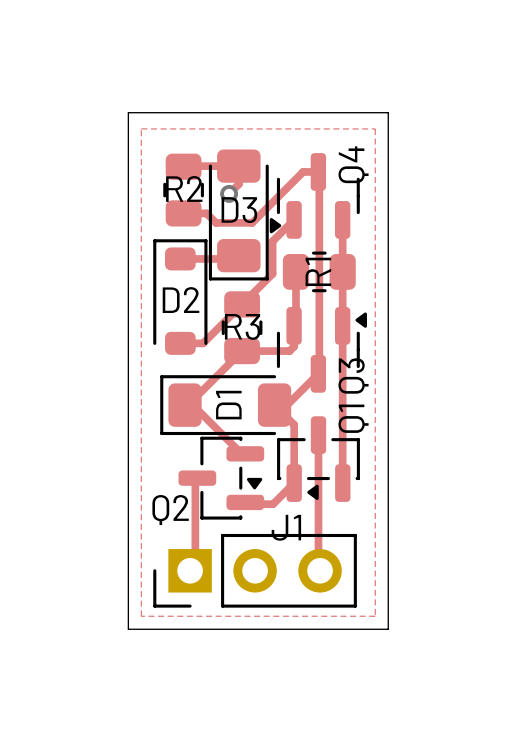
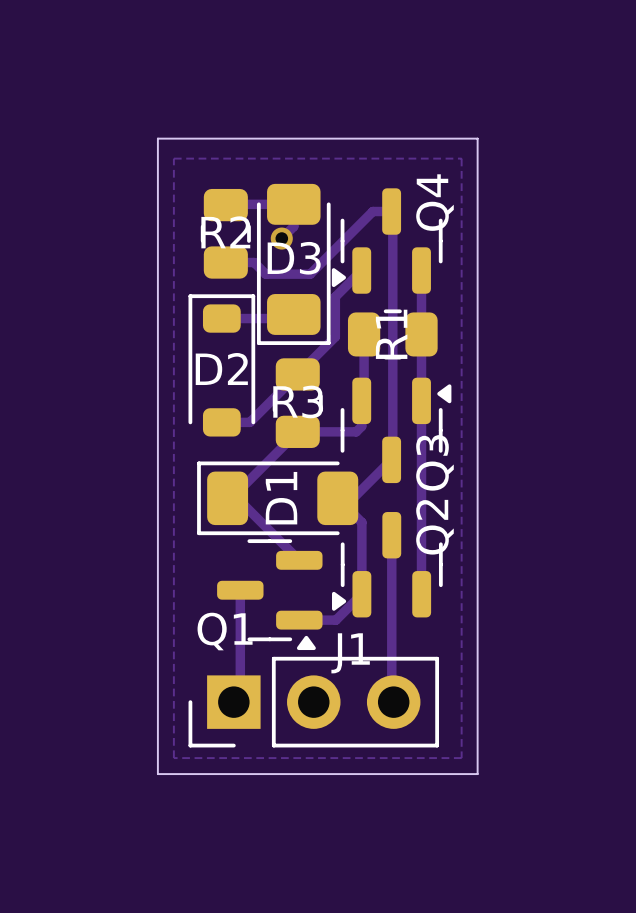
Q1 footprint: [277, 416, 360, 502] -> [217, 539, 323, 651]
Q1 name position: Q1 (353, 418) -> Q1 (225, 631)
Q2 footprint: [178, 436, 265, 520] -> [331, 512, 443, 618]
Q2 name position: Q2 (170, 510) -> Q2 (434, 527)

